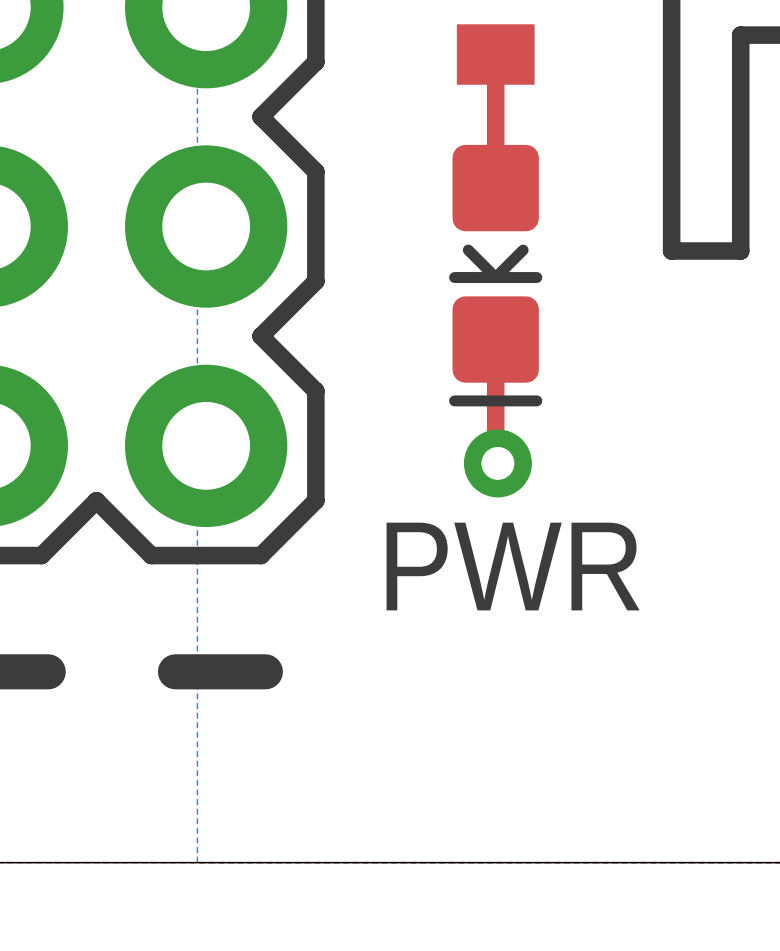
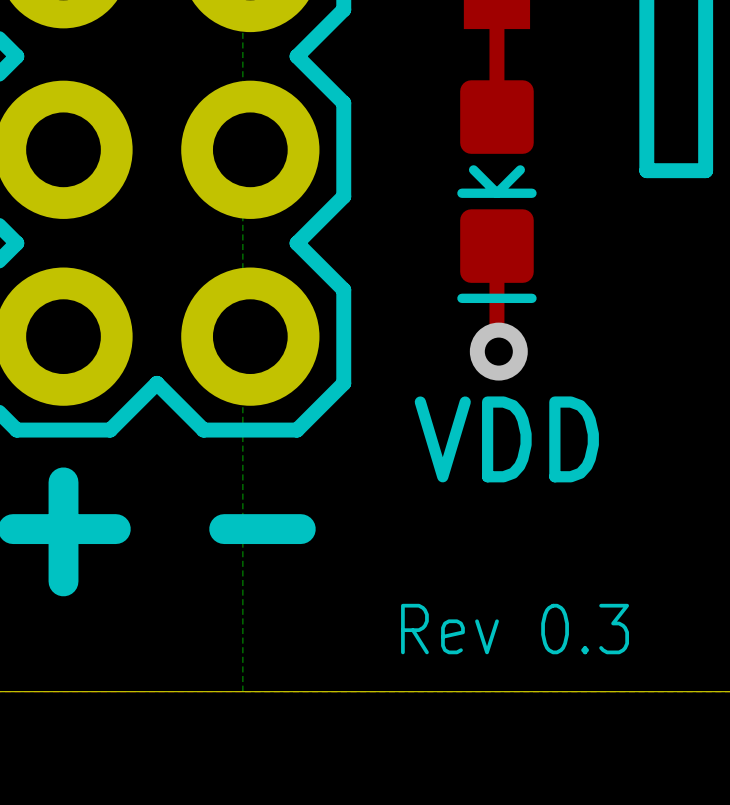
PWR name: PWR (513, 566) -> VDD (506, 439)
text: none -> Rev 0.3 (515, 629)

